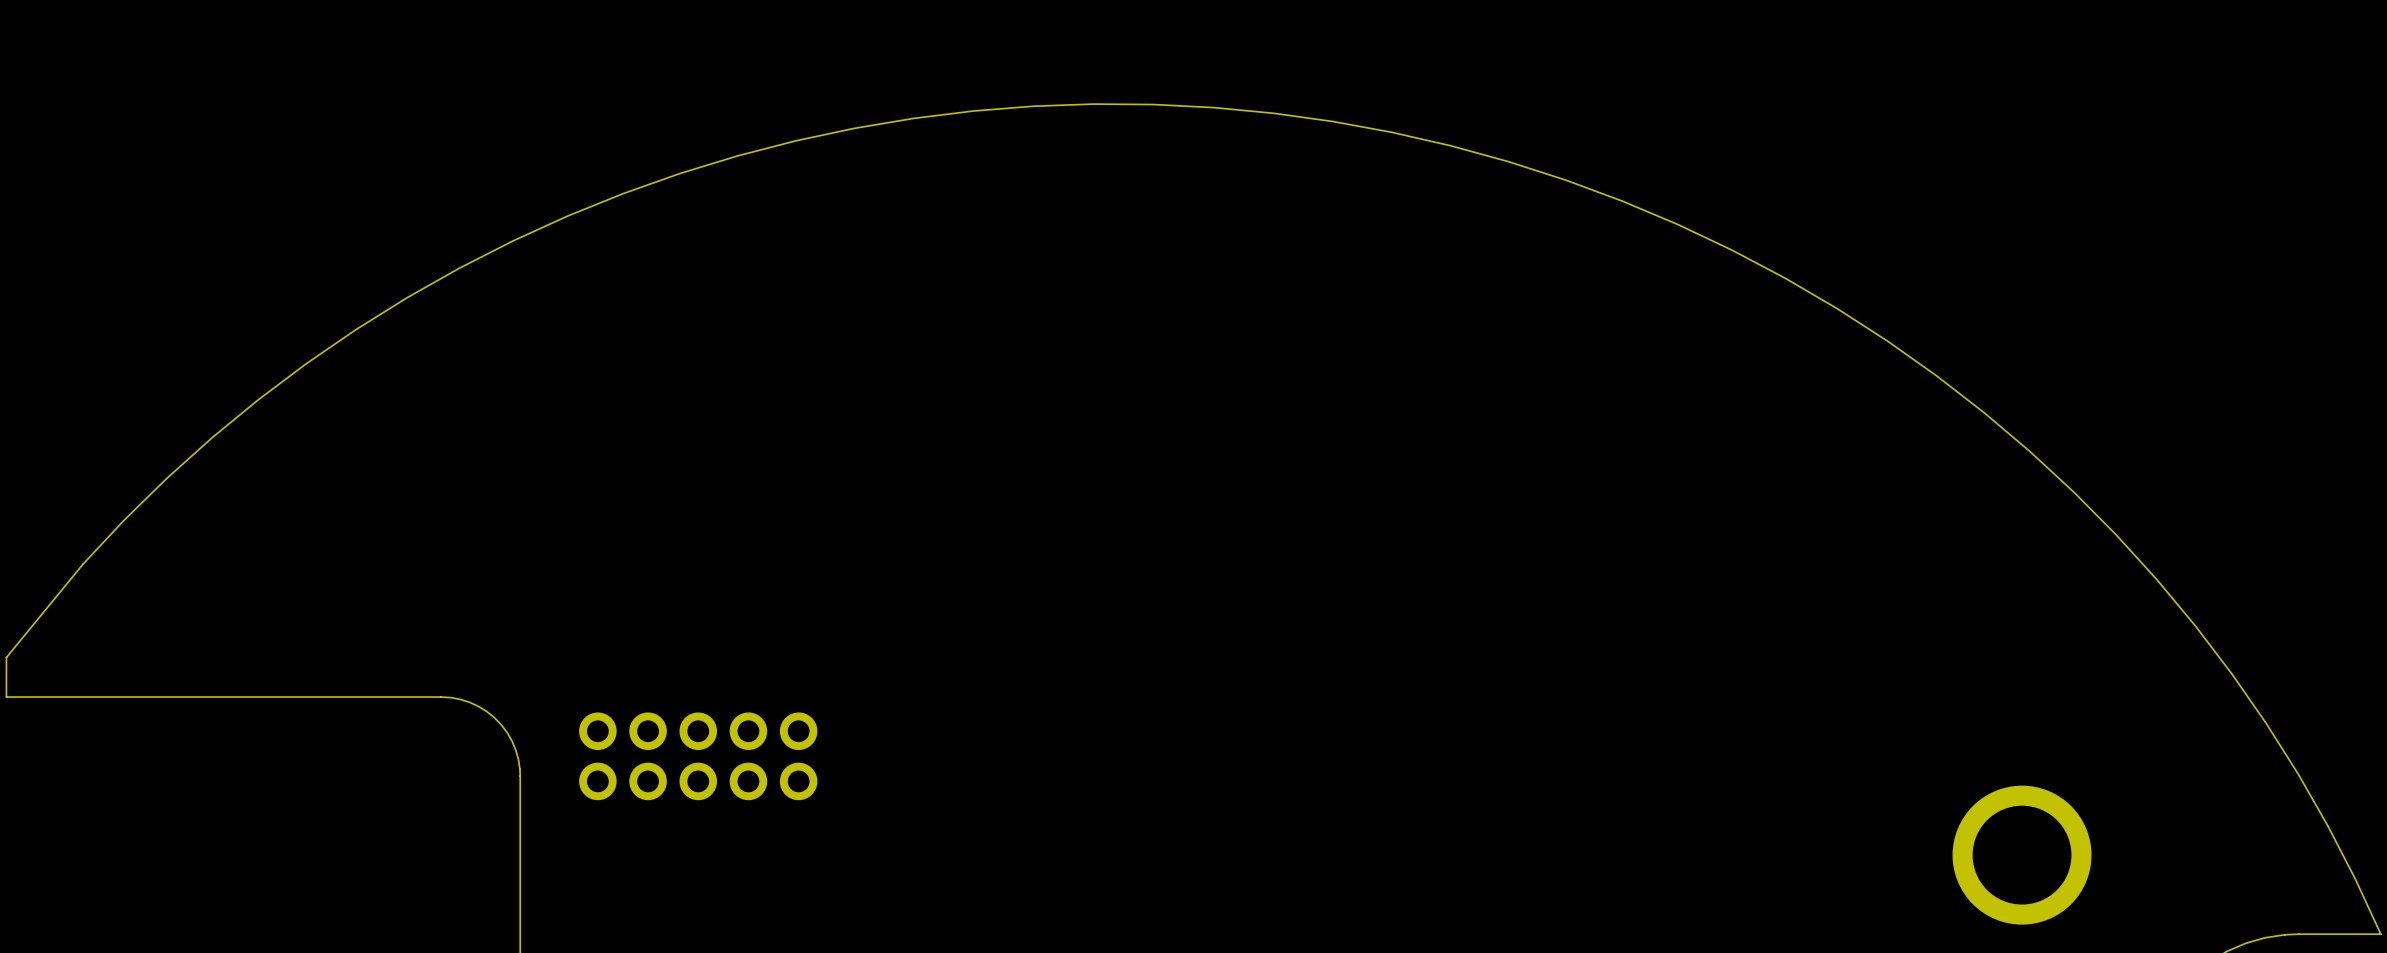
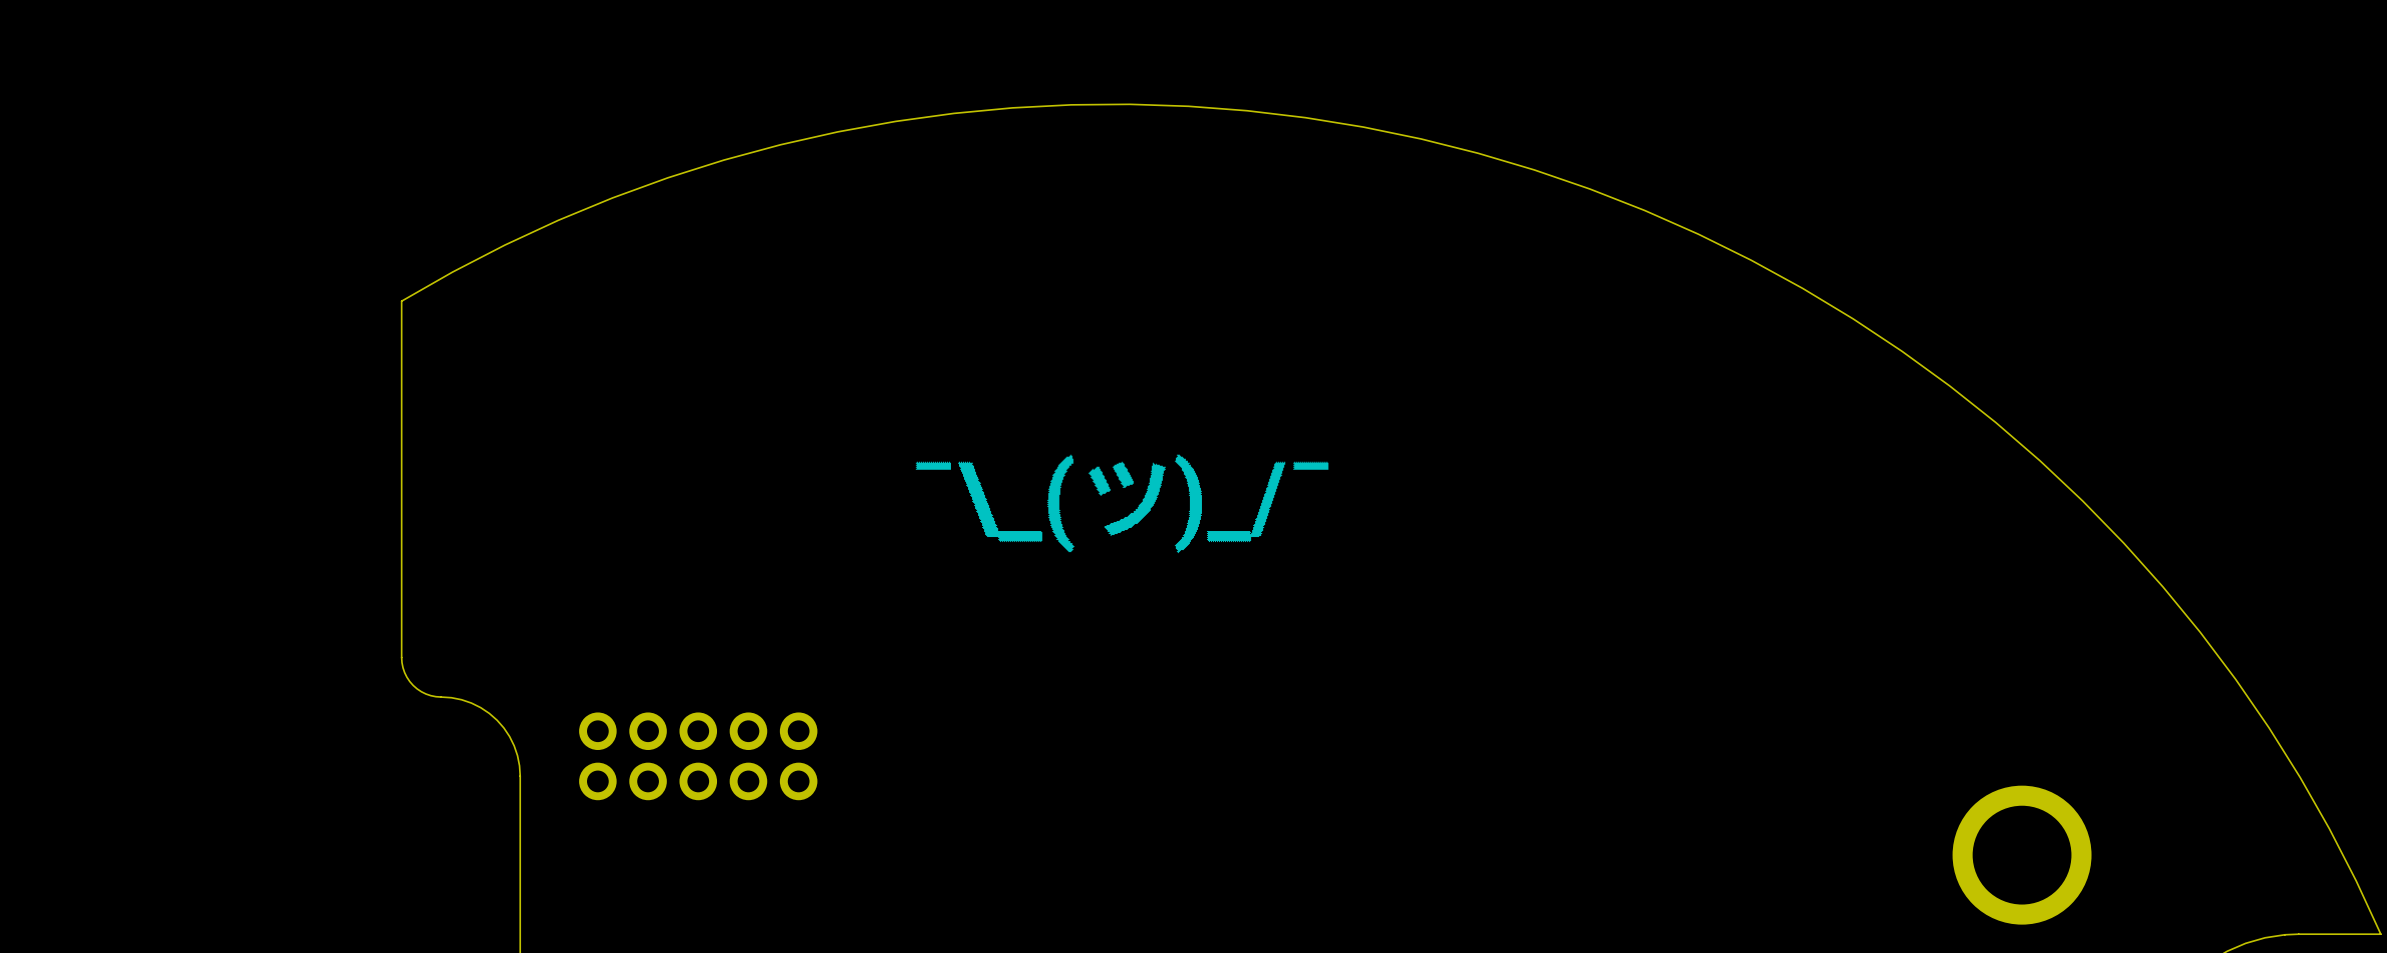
drawing: none -> [915, 454, 1329, 554]
board edge: (520, 776) (515, 750) (501, 724) (478, 706) (460, 699) (441, 697) (6, 697) (6, 657) (82, 564) (124, 520) (211, 438) (258, 399) (355, 329) (459, 268) (512, 241) (623, 193) (679, 173) (737, 155) (854, 128) (913, 118) (1033, 106) (1153, 104) (1213, 107) (1332, 121) (1392, 132) (1508, 161) (1622, 201) (1732, 250) (1785, 278) (1837, 308) (1936, 375) (2030, 451) (2074, 492) (2156, 579) (2195, 625) (2231, 673) (2298, 773) (2328, 826) (2380, 934) -> (520, 776) (514, 745) (497, 720) (471, 703) (451, 697) (430, 695) (421, 691) (409, 681) (403, 667) (401, 301) (504, 245) (612, 197) (723, 160) (837, 131) (953, 113) (1071, 104) (1188, 106) (1247, 110) (1305, 117) (1421, 138) (1478, 153) (1590, 189) (1644, 210) (1751, 260) (1802, 288) (1902, 351) (1995, 422) (2040, 460) (2123, 543) (2200, 632) (2235, 679) (2300, 777) (2356, 880) (2380, 934)

